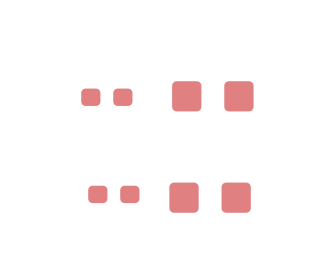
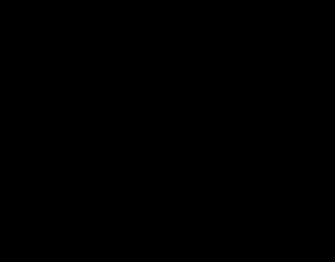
part: (212, 96) -> none
part: (106, 97) -> none
part: (113, 194) -> none
part: (210, 197) -> none

